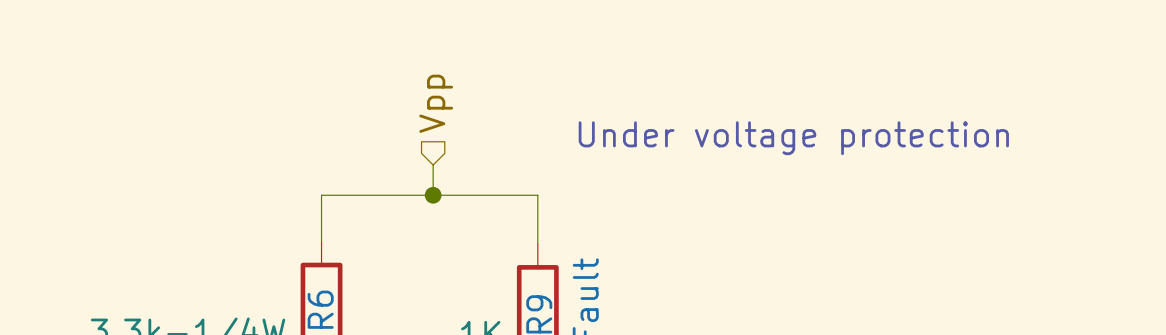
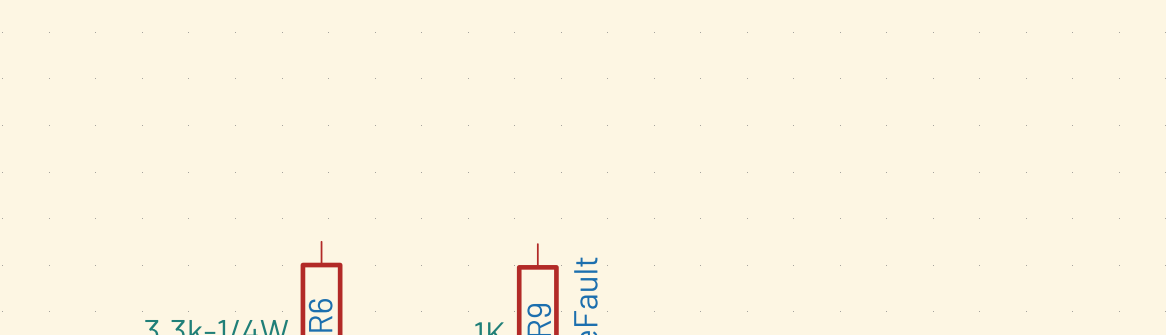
hierarchical label: Vpp (436, 103) -> none
text: Under voltage protection (793, 138) -> none
wire: (433, 165) (433, 195) -> none
junction: (433, 195) -> none
wire: (321, 241) (321, 195) (537, 195) (537, 244) -> none

